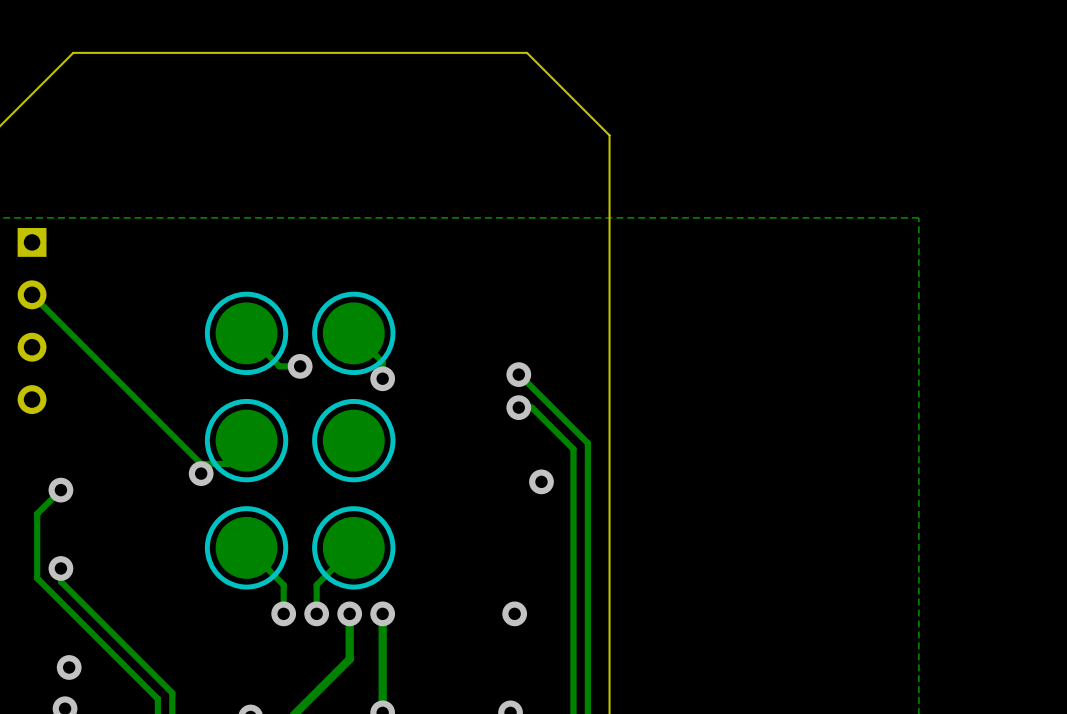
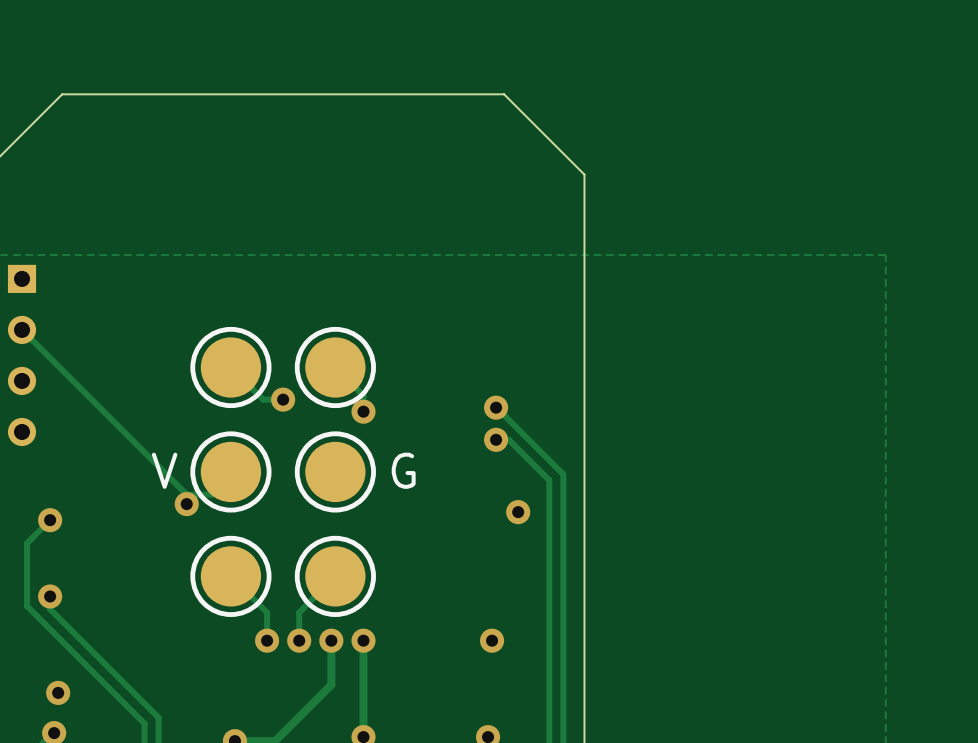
text: none -> V (164, 470)
text: none -> G (403, 470)

